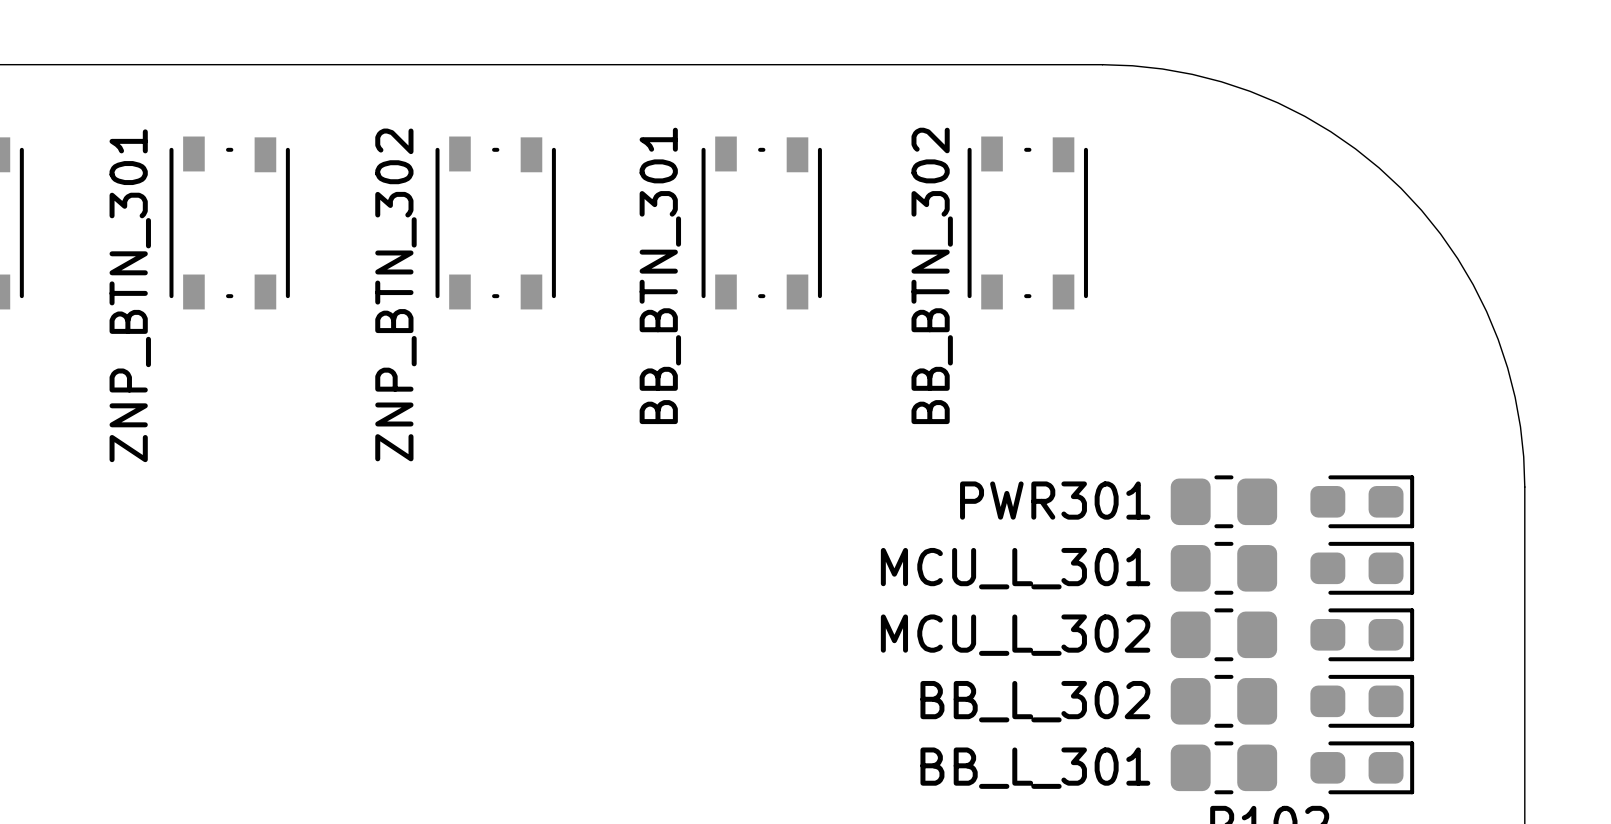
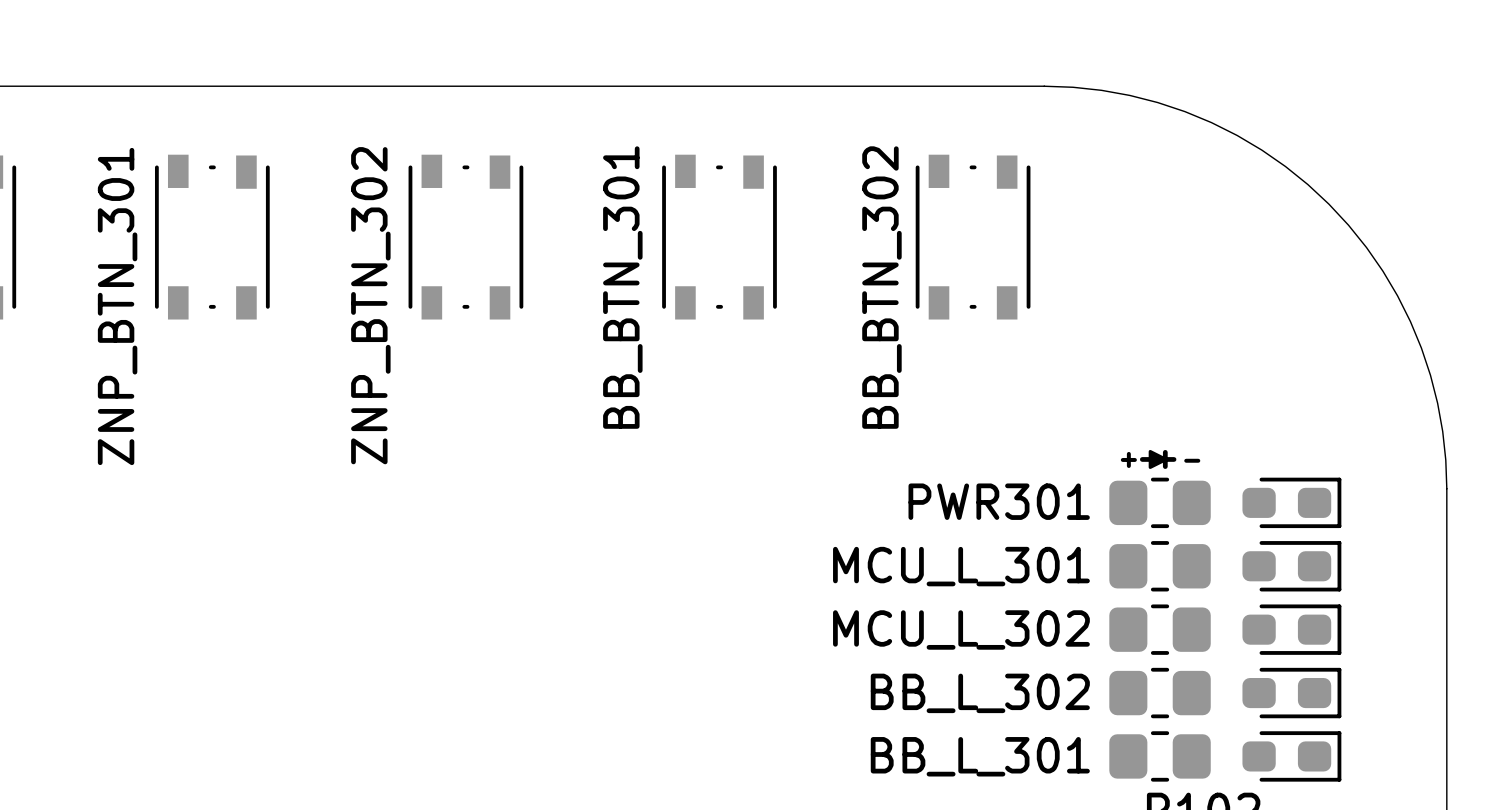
drawing: none -> [1148, 449, 1168, 469]
line: none -> (1165, 452) (1165, 466)
text: none -> + (1128, 459)
line: none -> (1142, 459) (1151, 459)
line: none -> (1166, 459) (1174, 459)
text: none -> - (1192, 460)

